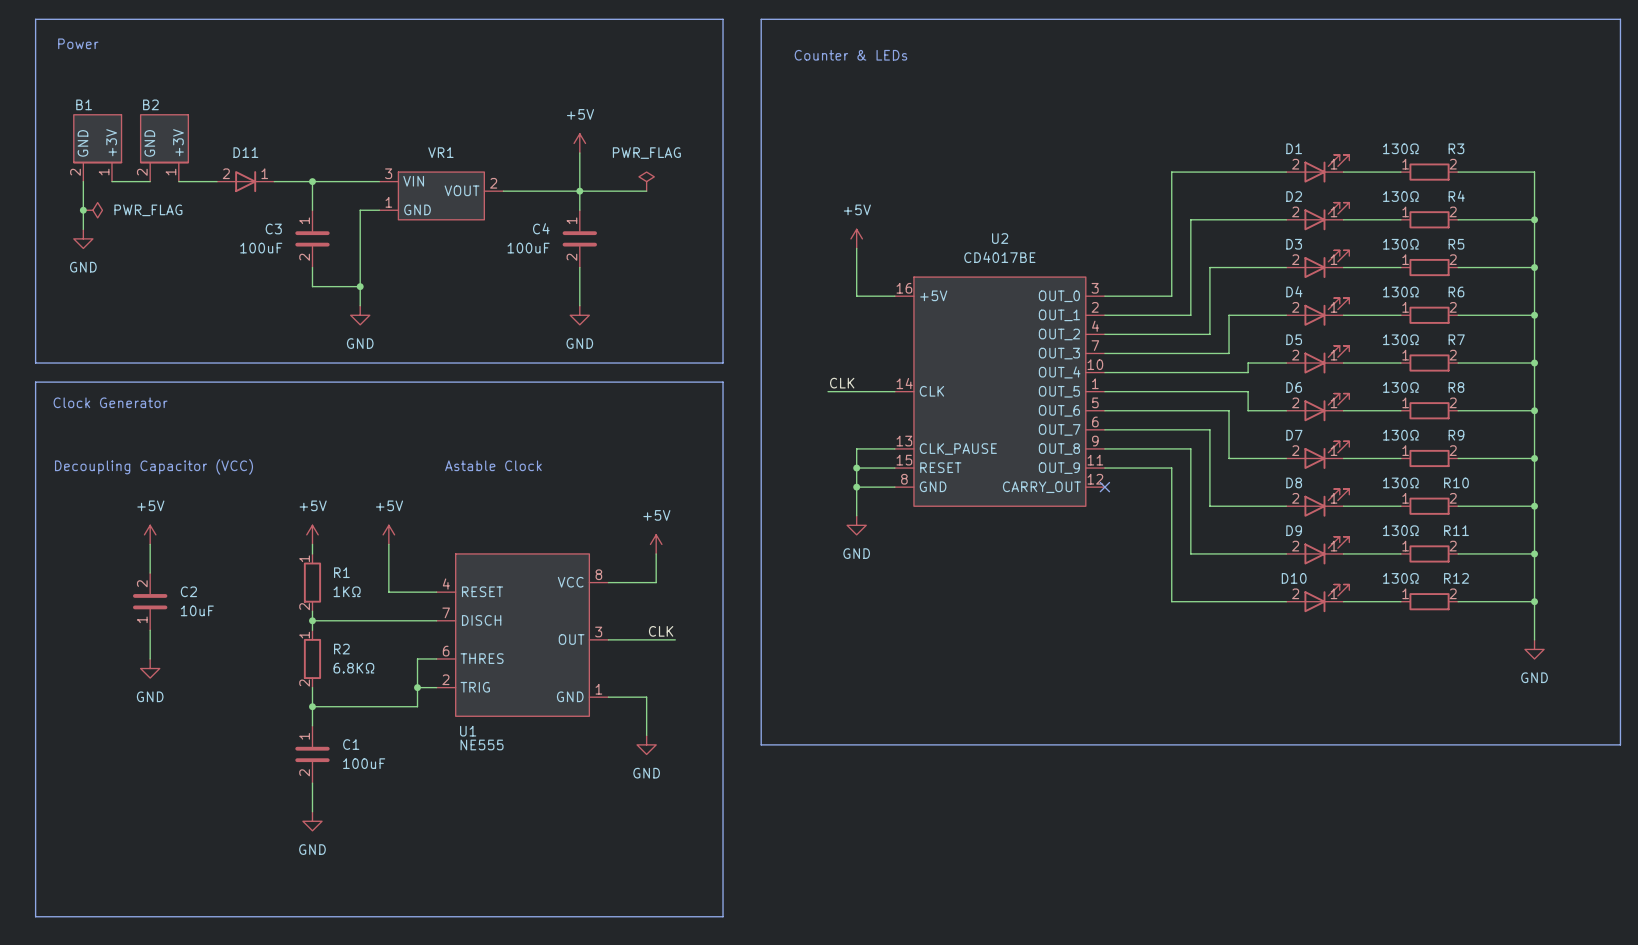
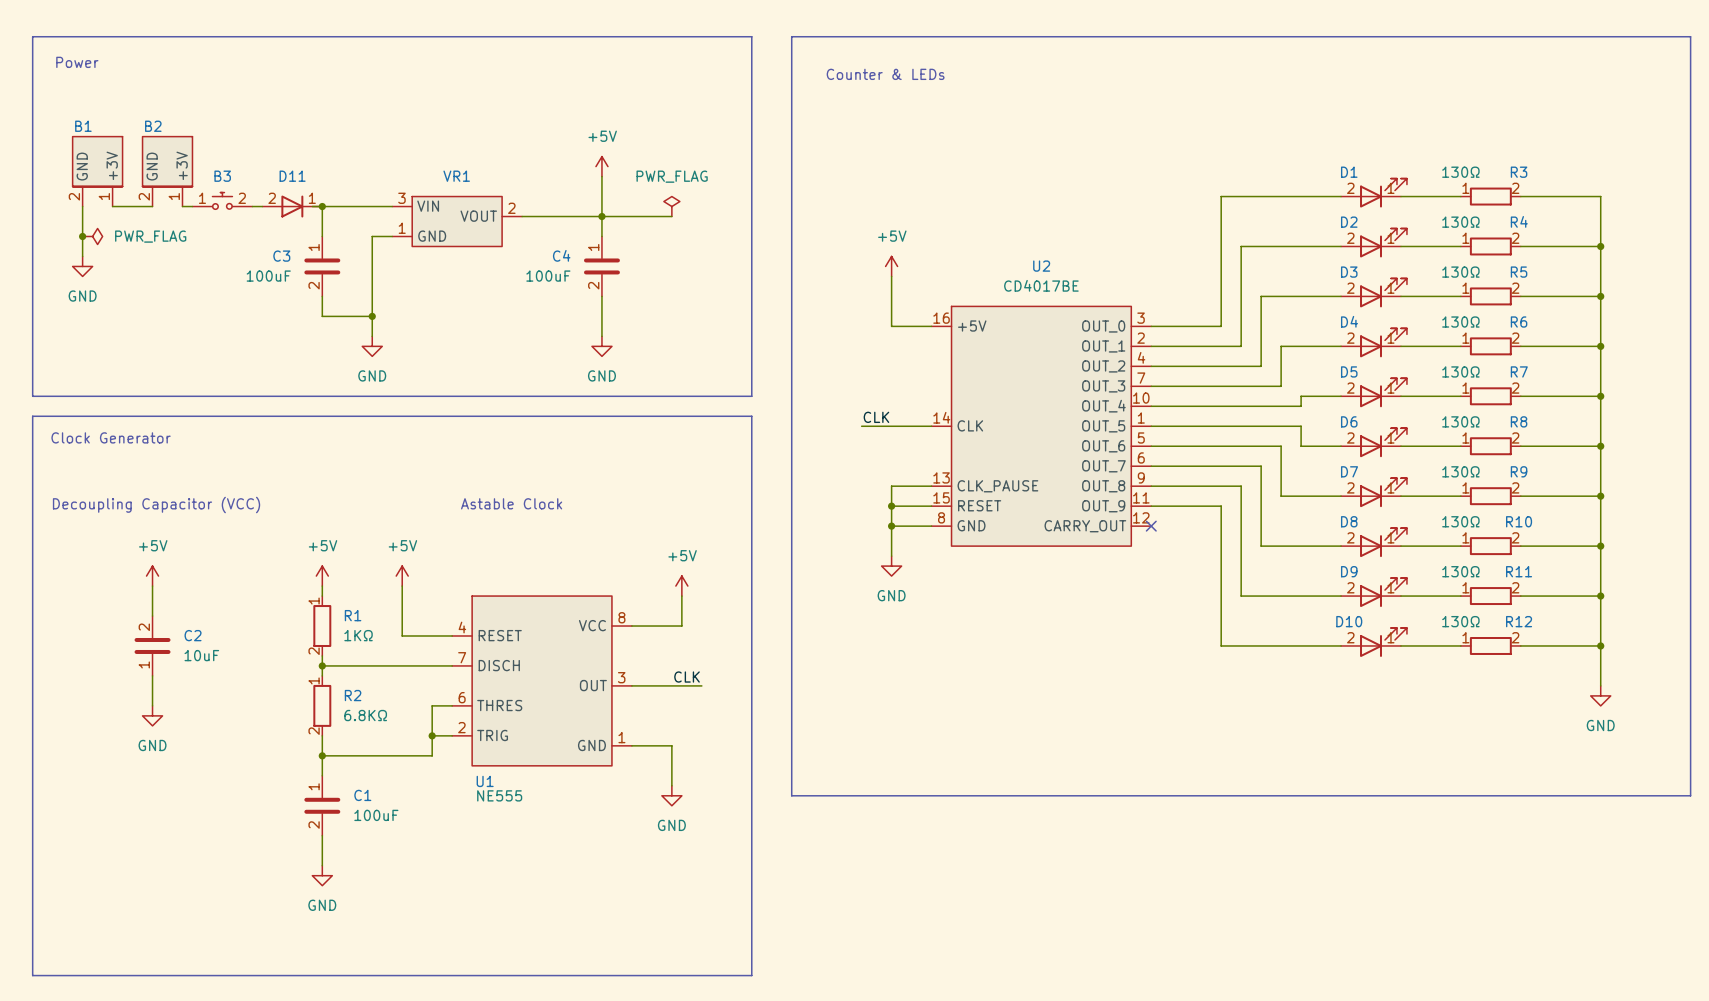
B3: none -> (222, 200)
D11 position: (245, 181) -> (292, 206)

